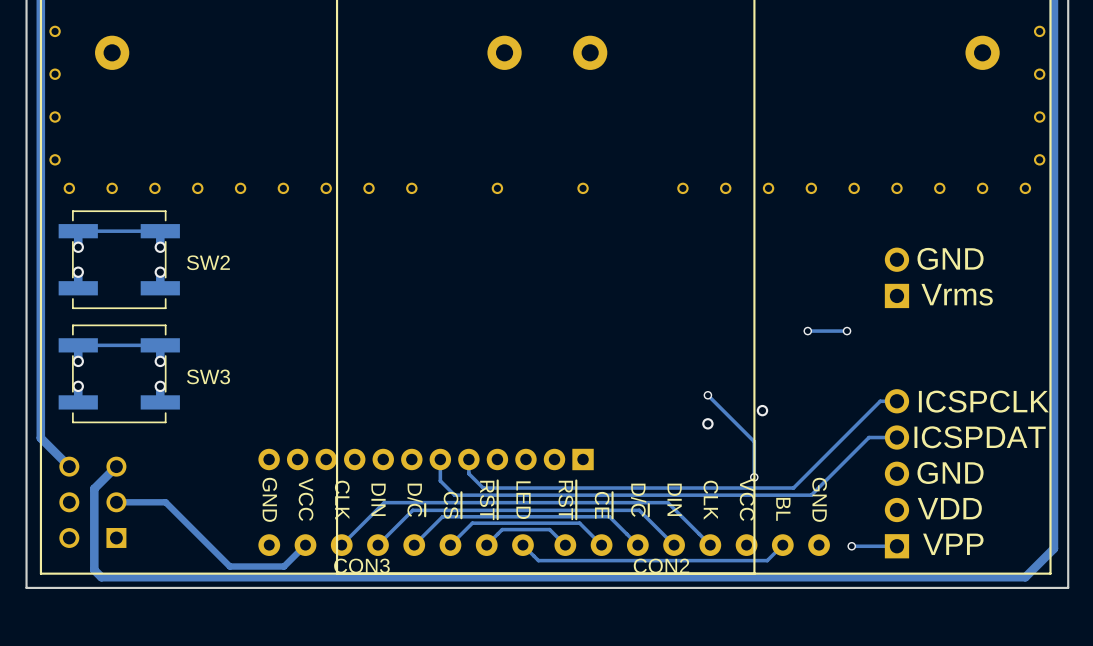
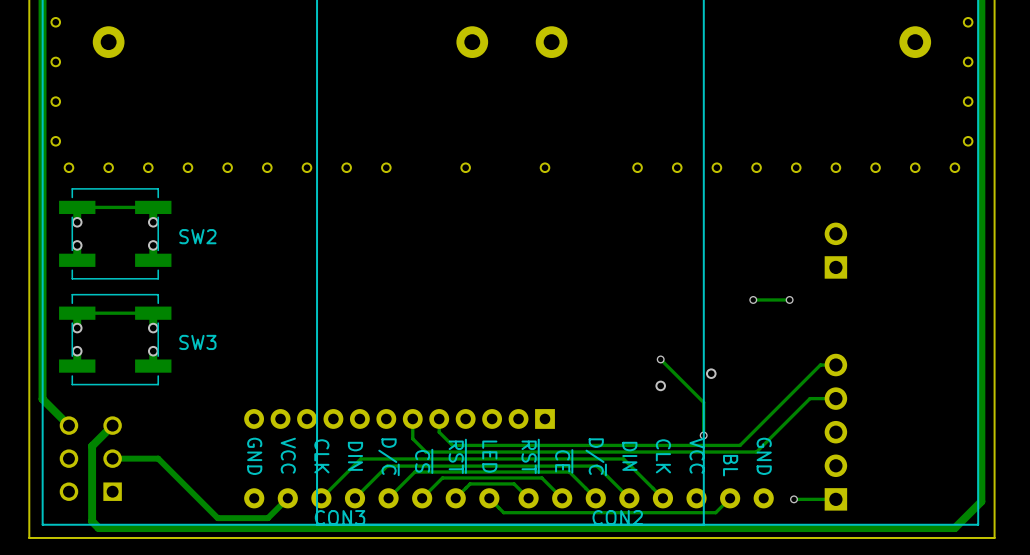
text: GND (950, 258) -> none
text: Vrms (957, 294) -> none
text: ICSPCLK (983, 401) -> none
text: ICSPDAT (980, 437) -> none
text: GND (950, 472) -> none
text: VDD (949, 508) -> none
text: VPP (953, 544) -> none

